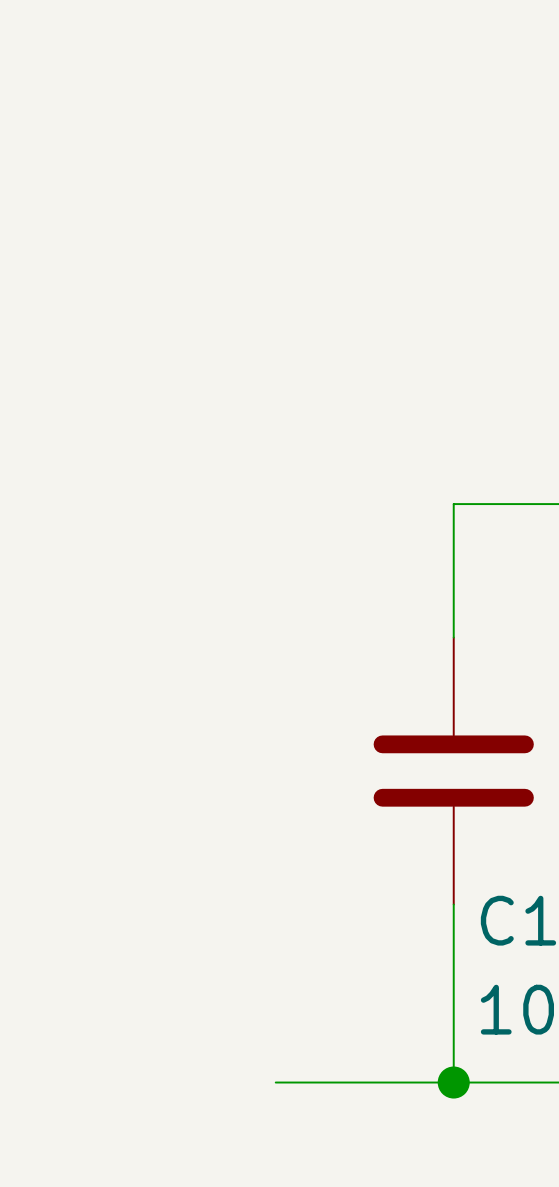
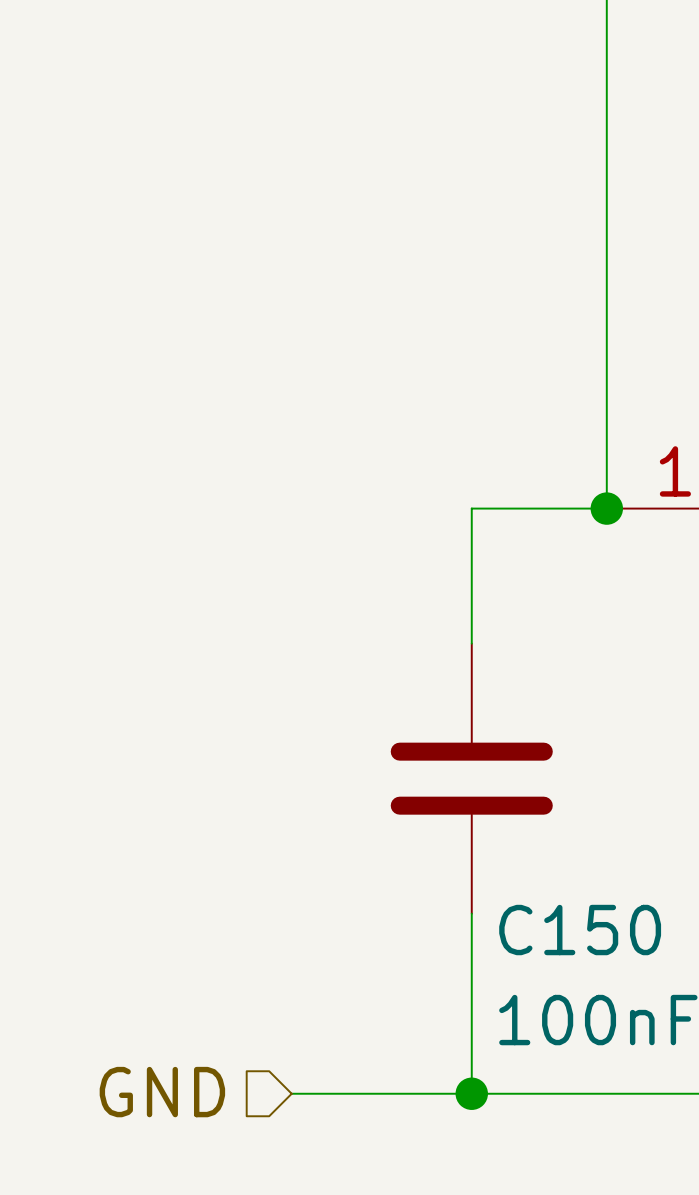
hierarchical label: none -> GND (162, 1092)

